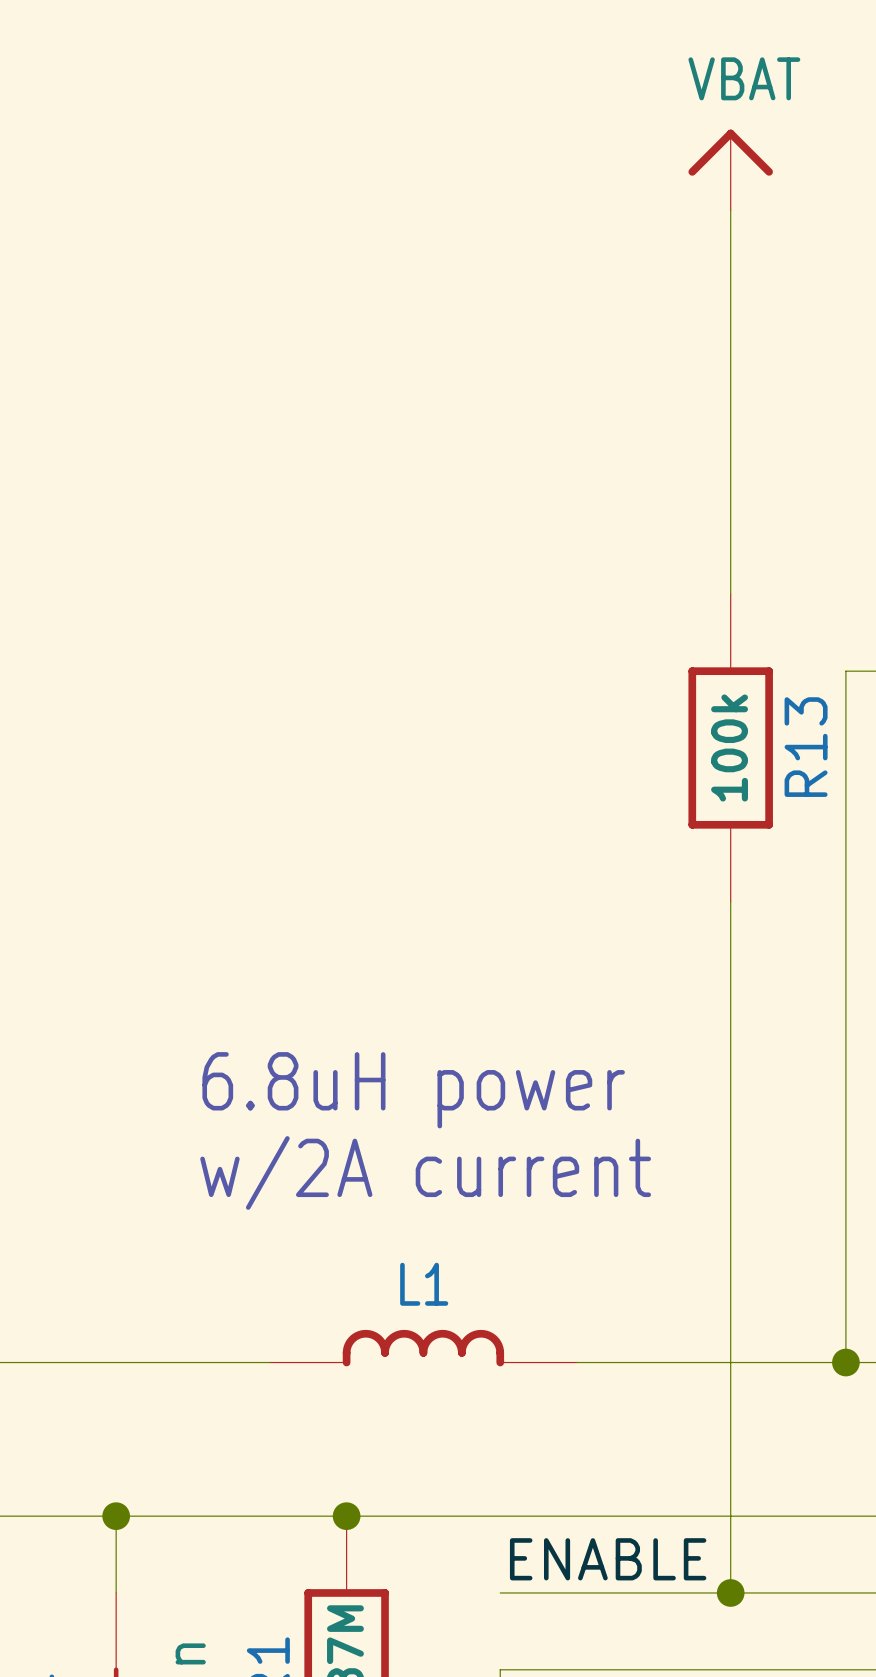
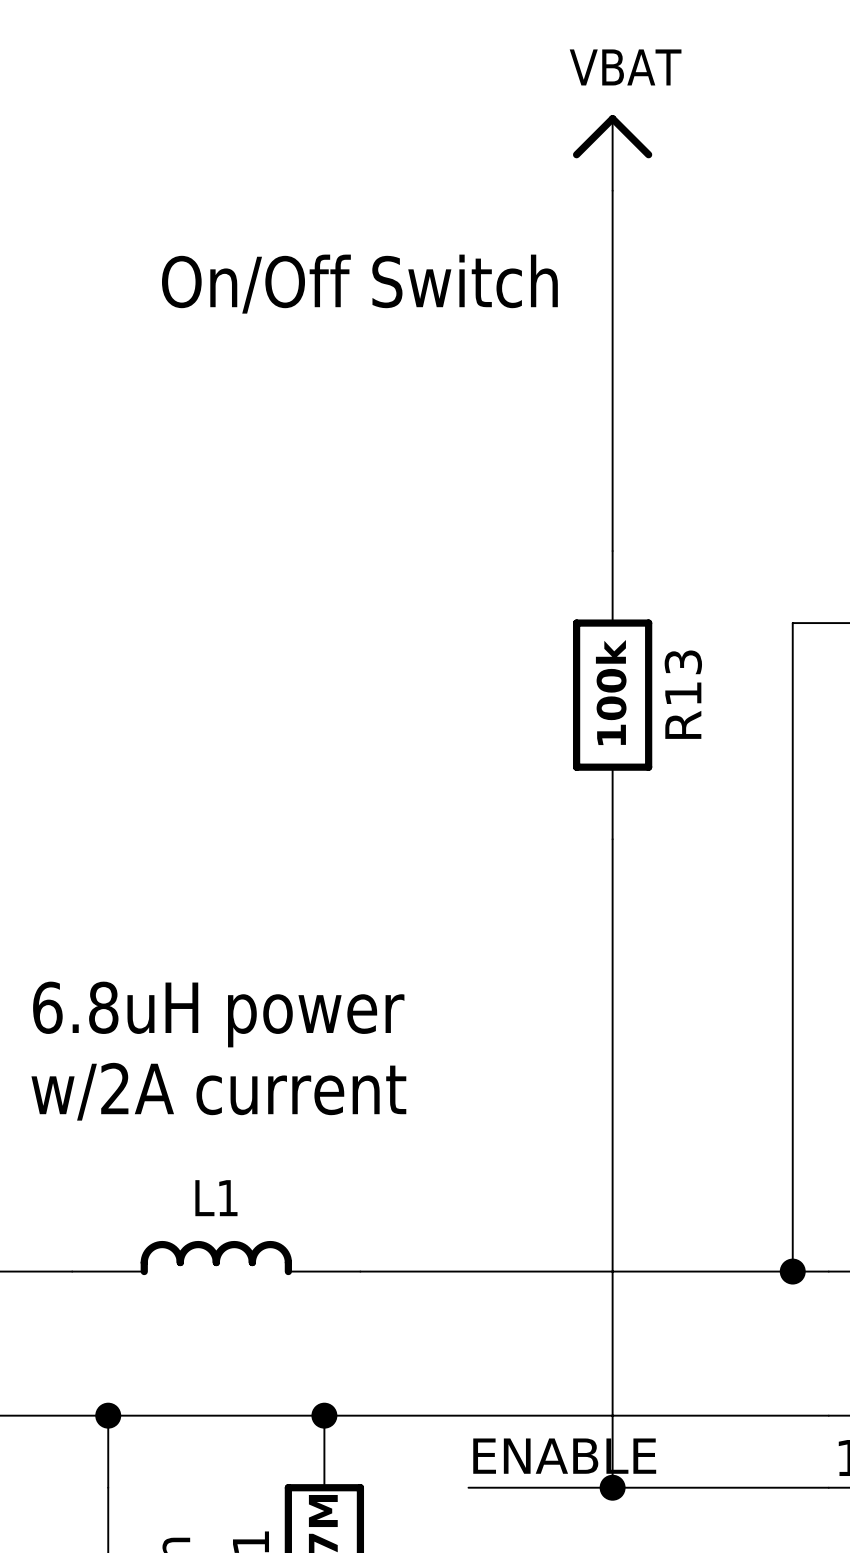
power symbol position: VBAT (730, 169) -> VBAT (612, 152)
wire: (730, 210) (730, 594) -> (612, 190) (612, 551)
text: none -> On/Off Switch (359, 284)
R13 position: (730, 747) -> (612, 695)
wire: (730, 901) (730, 1592) -> (612, 839) (612, 1487)
text position: 6.8uH power (413, 1090) -> 6.8uH power (218, 1014)
text position: w/2A current (425, 1172) -> w/2A current (218, 1091)
L1 position: (423, 1348) -> (216, 1258)
wire: (77, 1362) (269, 1362) -> (360, 1271) (540, 1271)
junction position: (730, 1592) -> (612, 1487)

